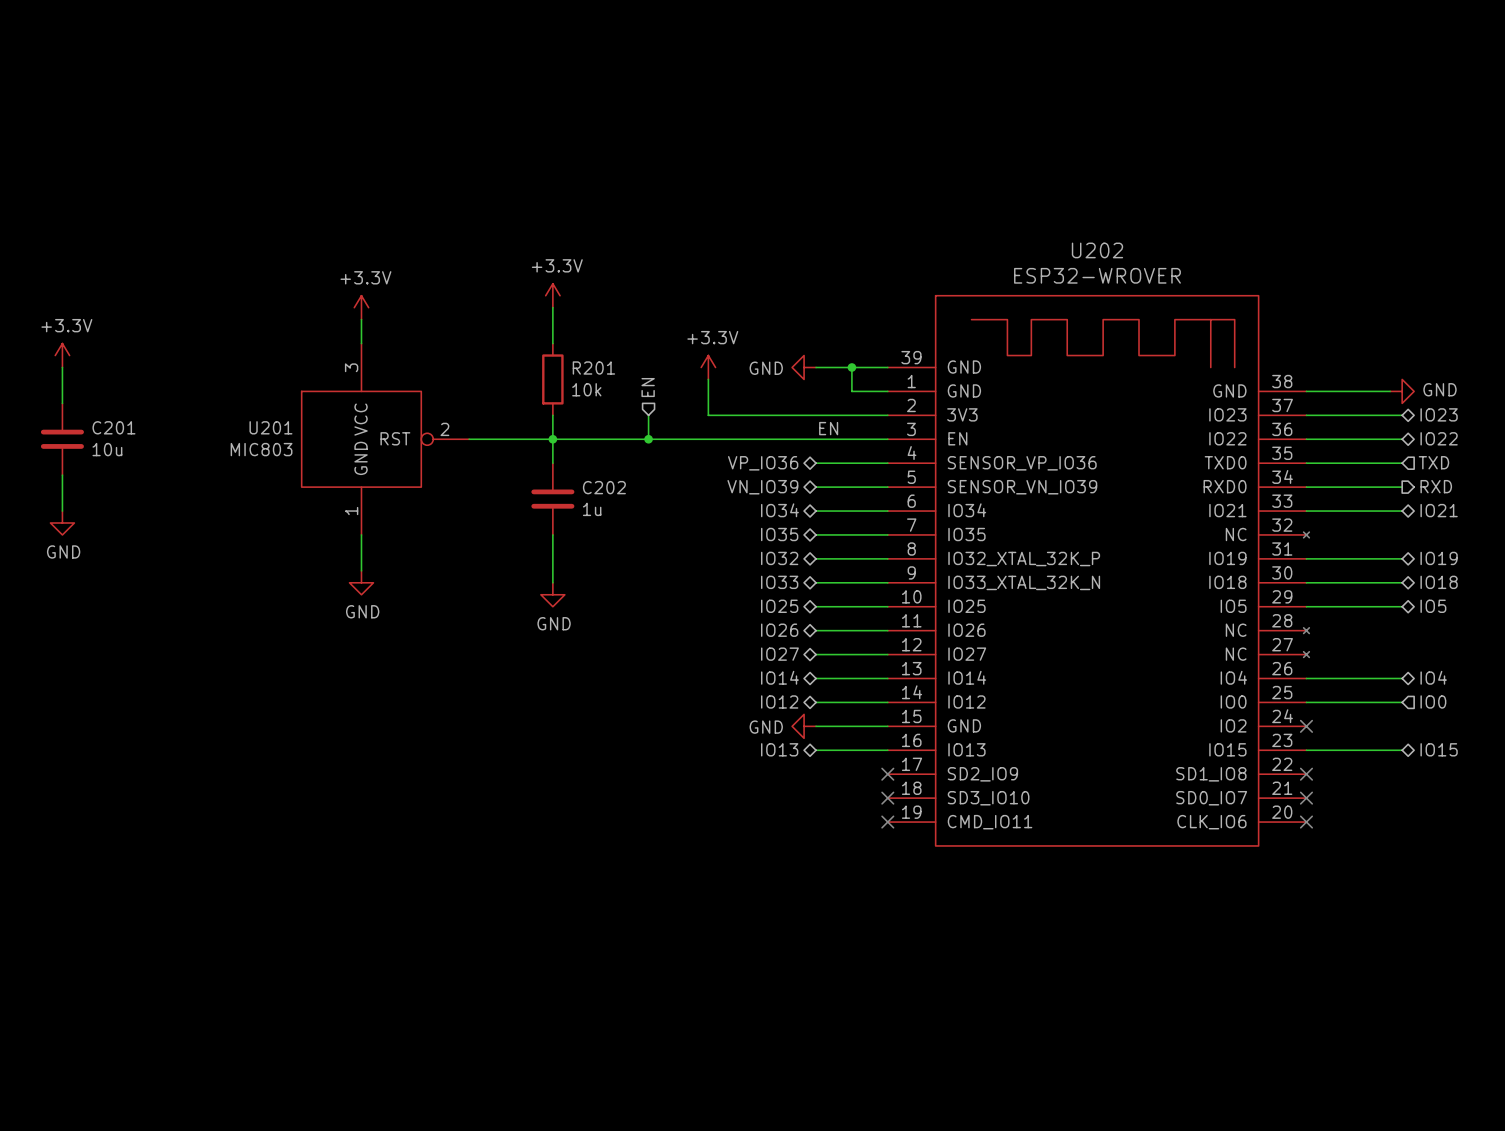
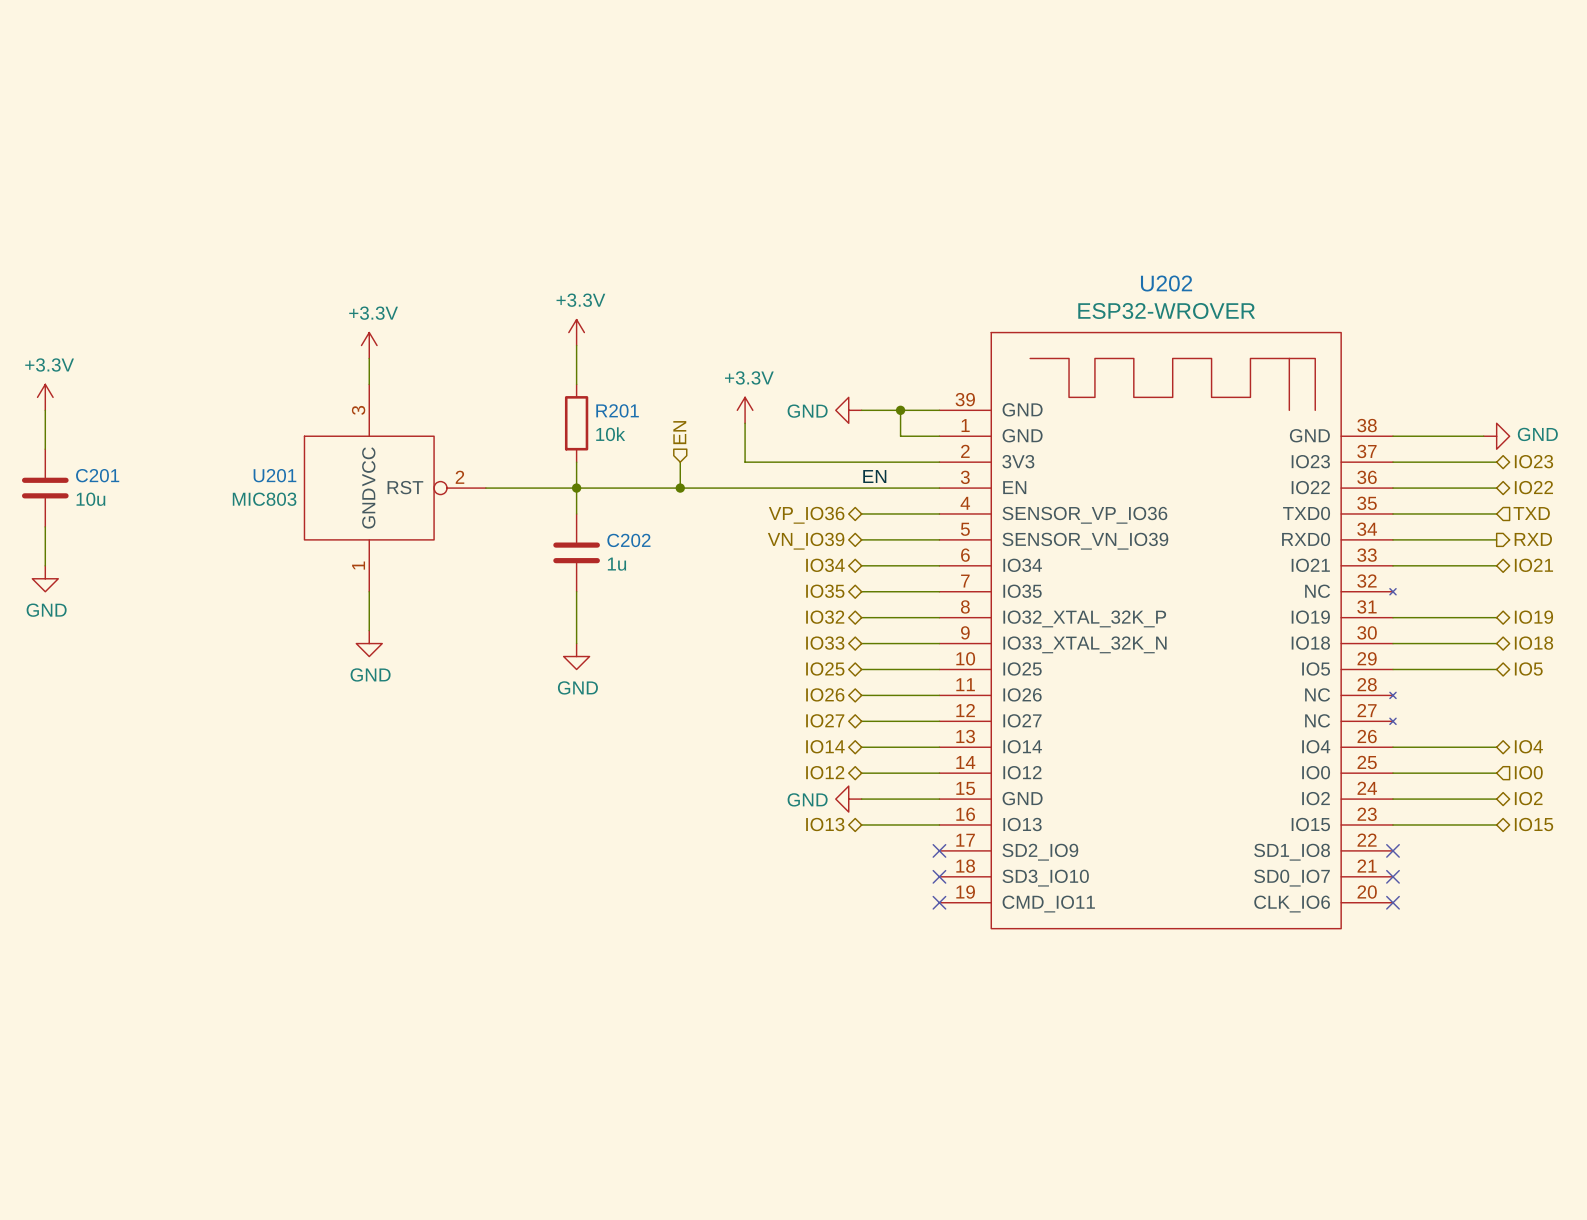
hierarchical label: none -> IO2 (1528, 798)
wire: none -> (1392, 799) (1496, 799)
no-connect mark: (1306, 726) -> none

